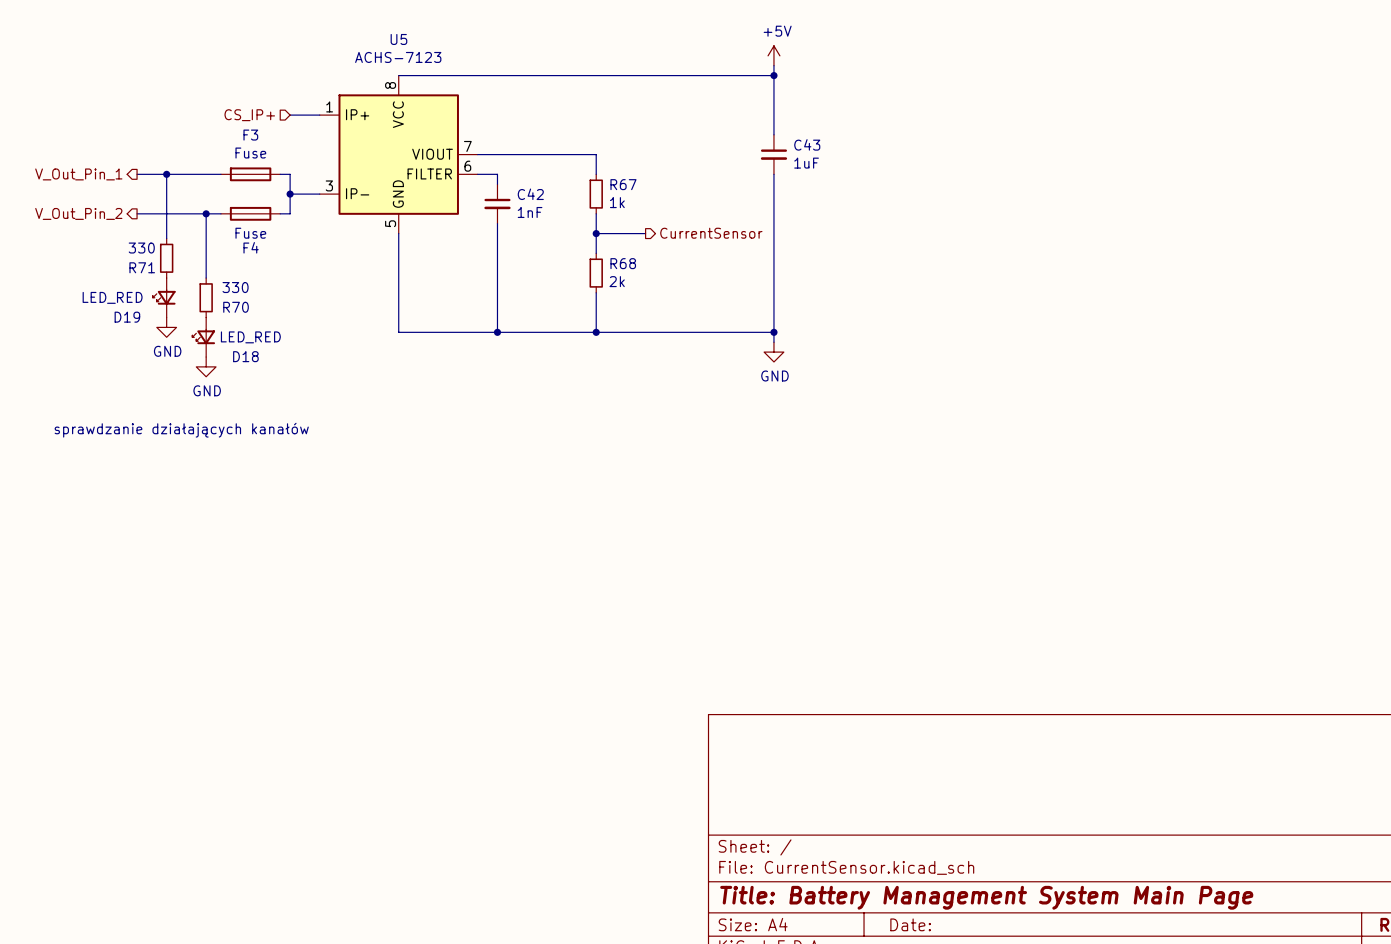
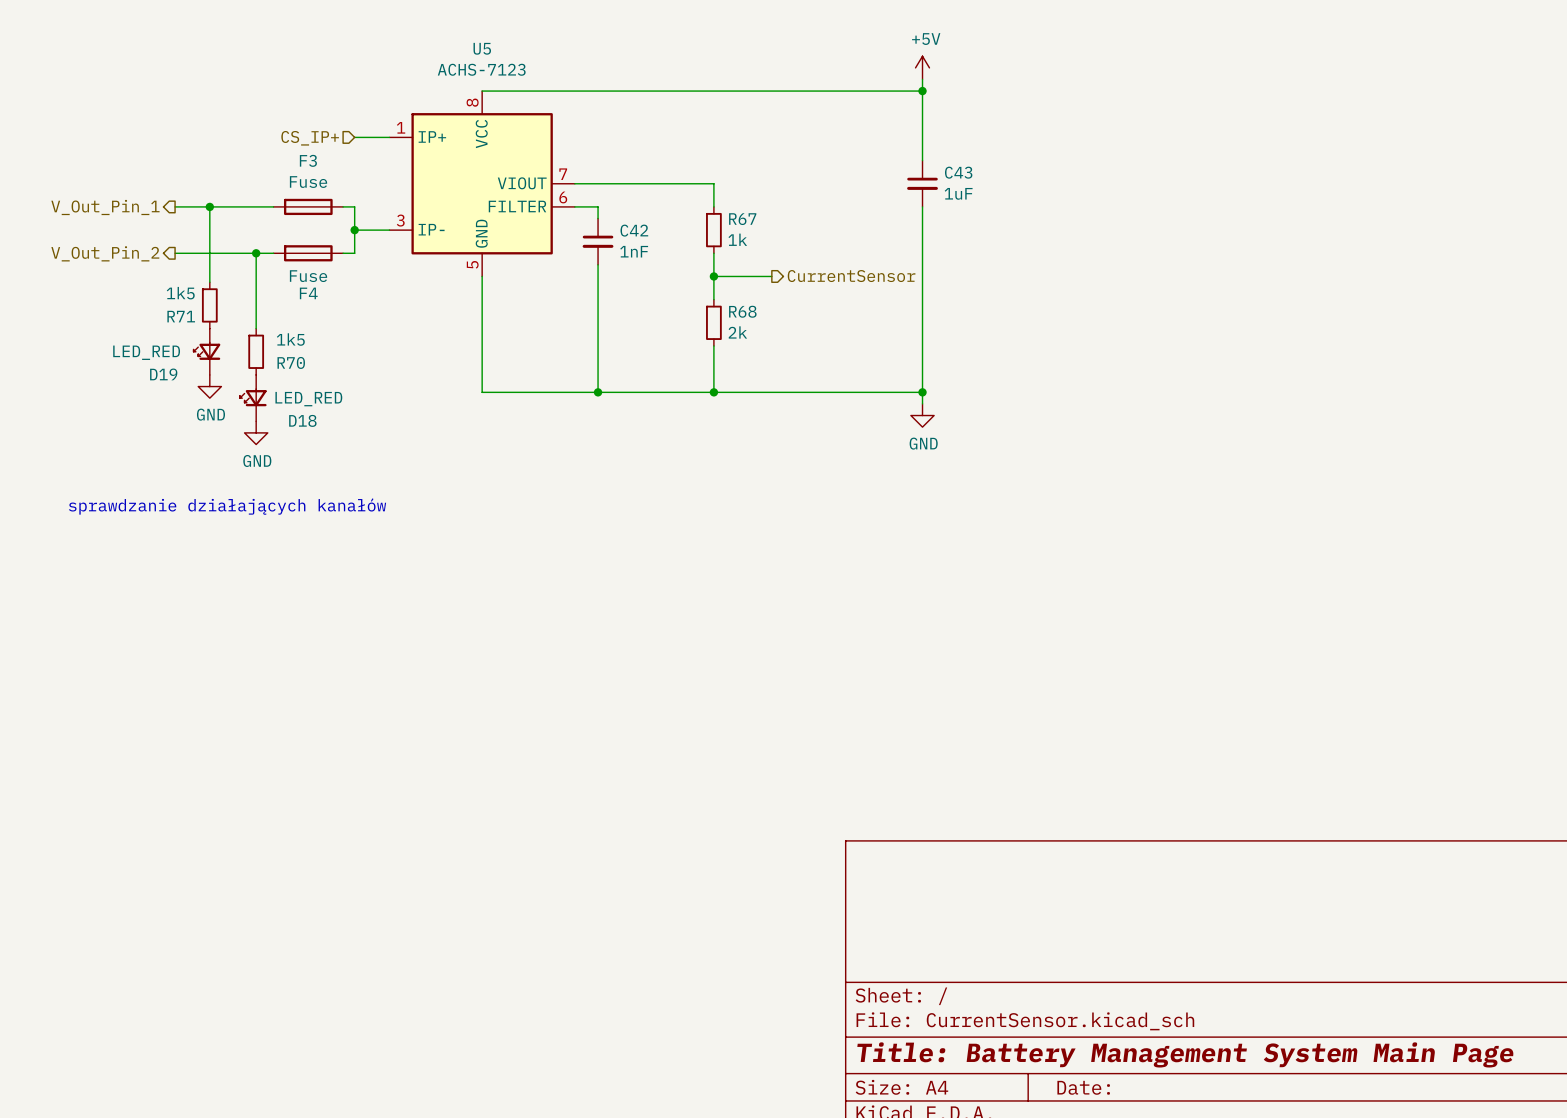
R71 value: 330 (141, 248) -> 1k5 (180, 293)
R70 value: 330 (235, 287) -> 1k5 (290, 339)

